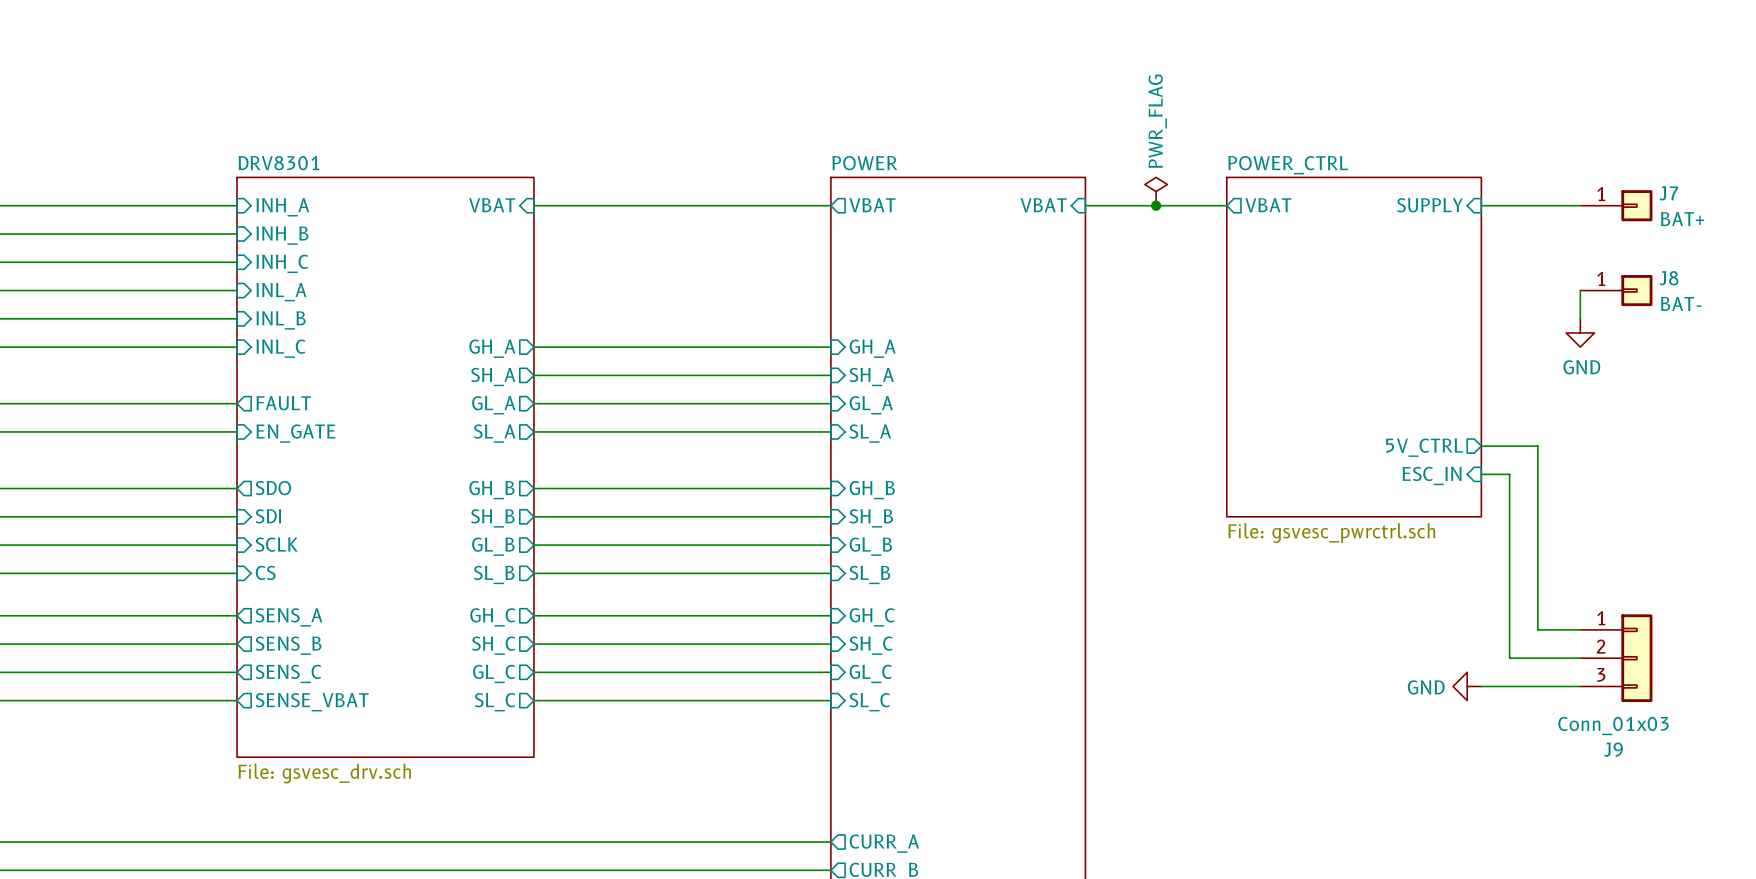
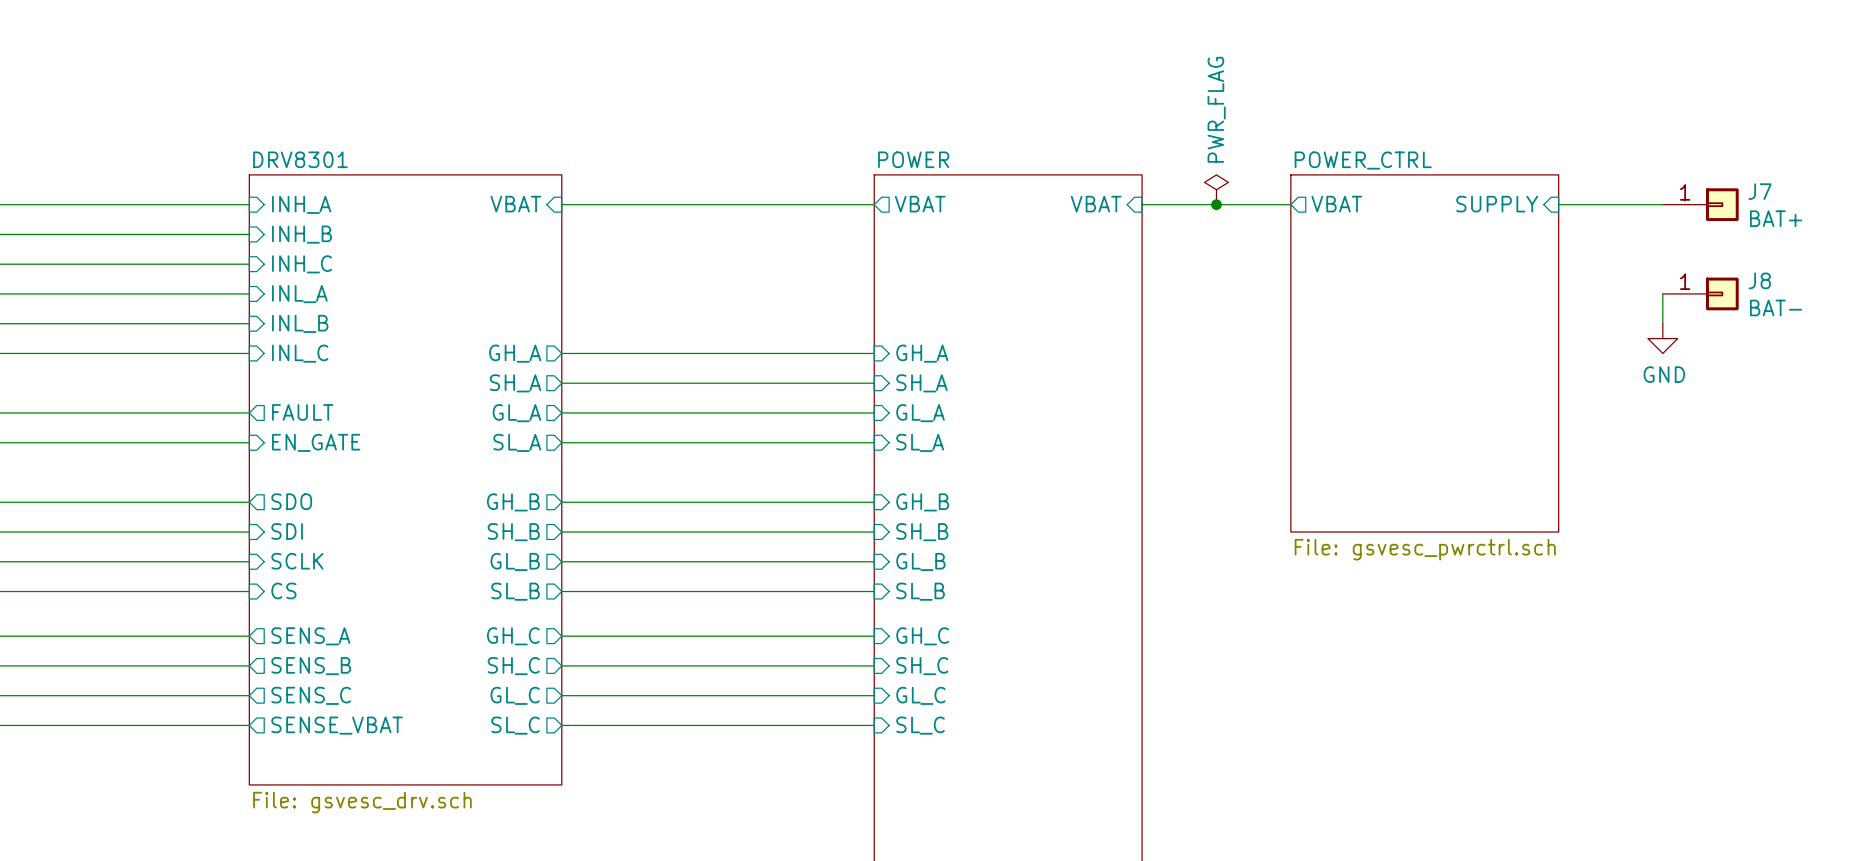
wire: (1481, 446) (1537, 446) (1537, 629) (1580, 629) -> none
sheet pin: 5V_CTRL (1424, 447) -> none
wire: (1481, 474) (1509, 474) (1509, 658) (1580, 658) -> none
sheet pin: ESC_IN (1432, 475) -> none
J9: Conn_01x03 (1616, 658) -> none
power symbol: GND (1467, 686) -> none
wire: (1481, 686) (1580, 686) -> none

